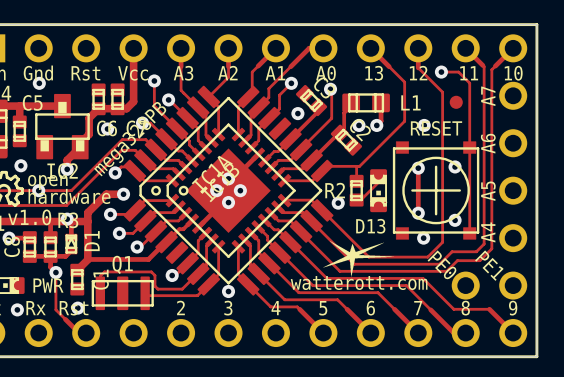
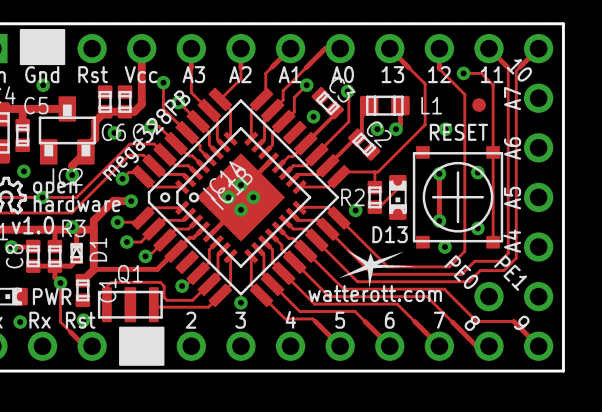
drawing: none -> [19, 29, 66, 66]
text rotation: 0° (513, 73) -> 45° clockwise (519, 70)
text rotation: 0° (465, 308) -> 45° clockwise (472, 323)
text rotation: 0° (513, 308) -> 45° clockwise (521, 322)
drawing: none -> [119, 326, 165, 366]

